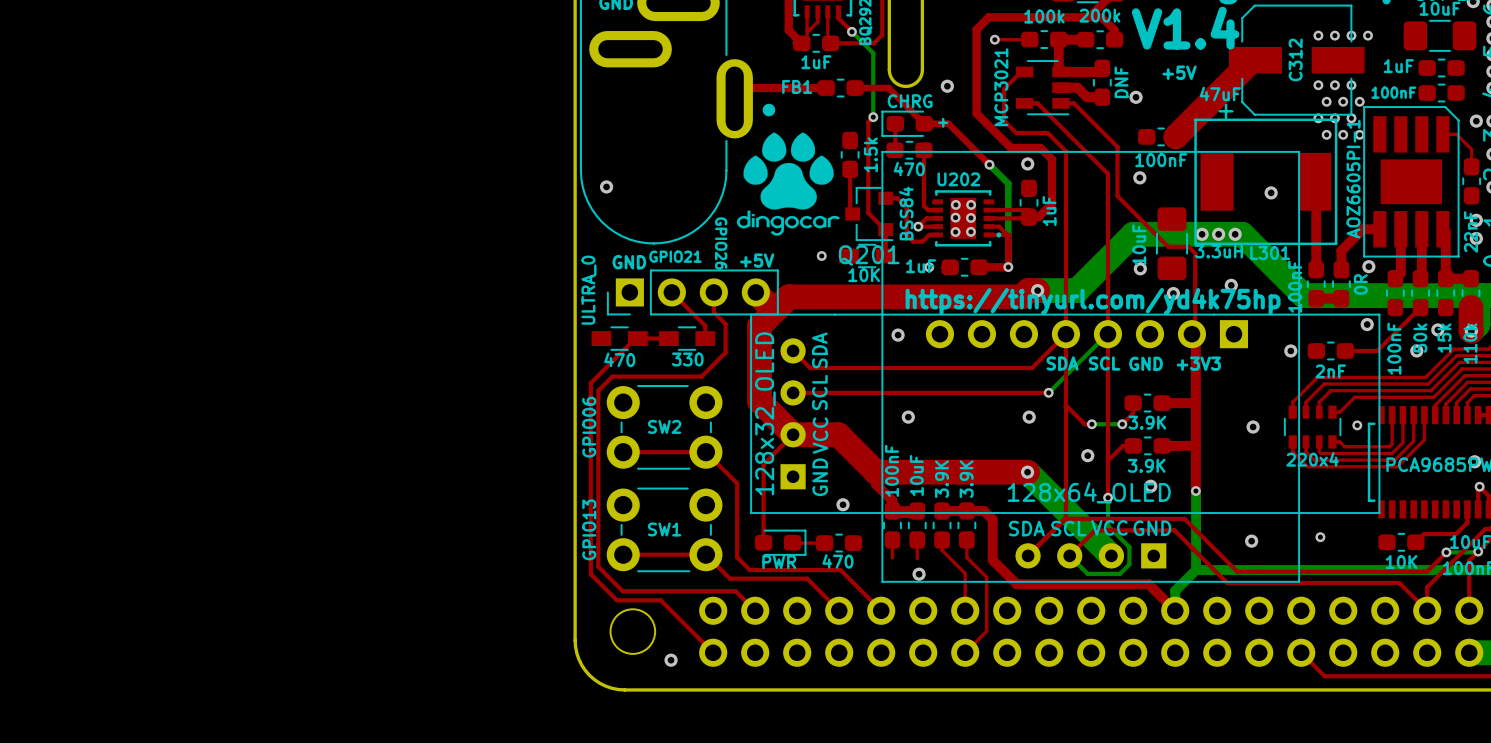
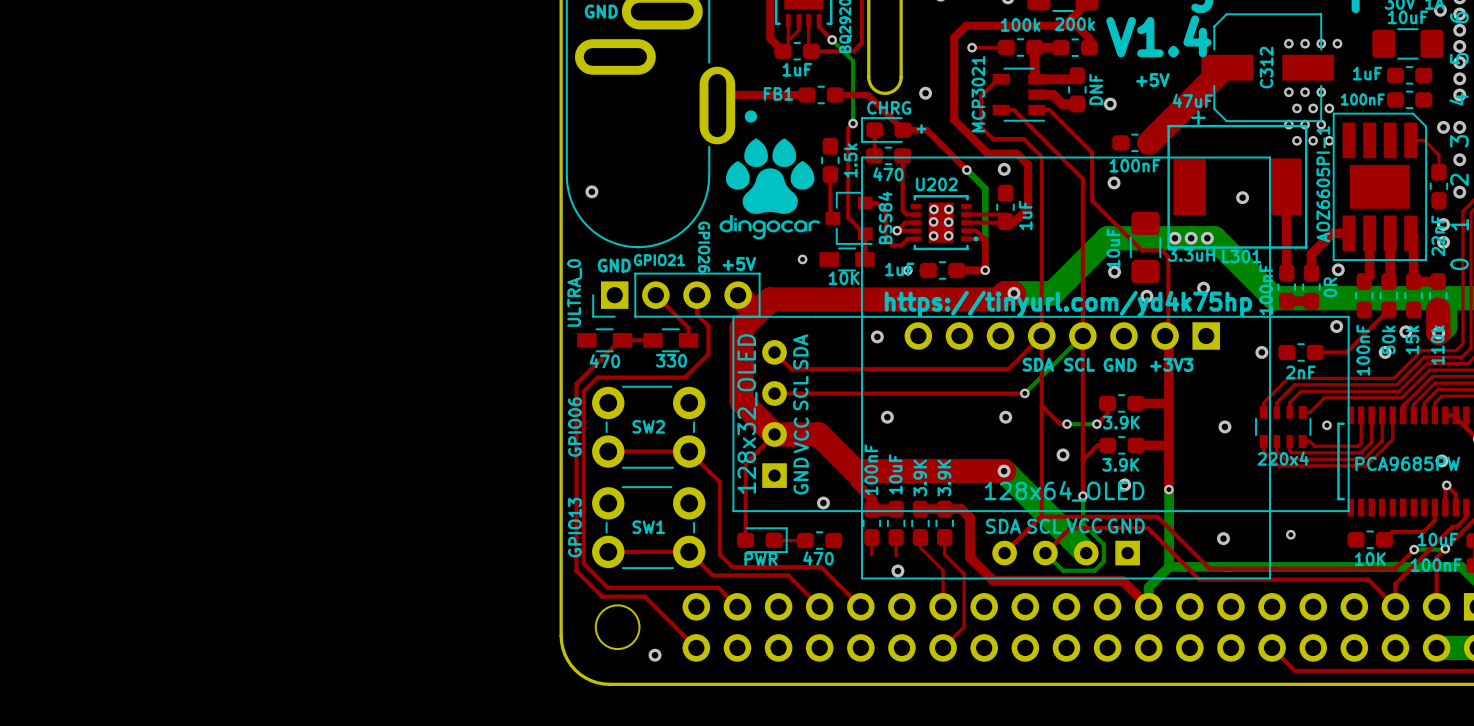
Q201 name: Q201 (869, 255) -> none

